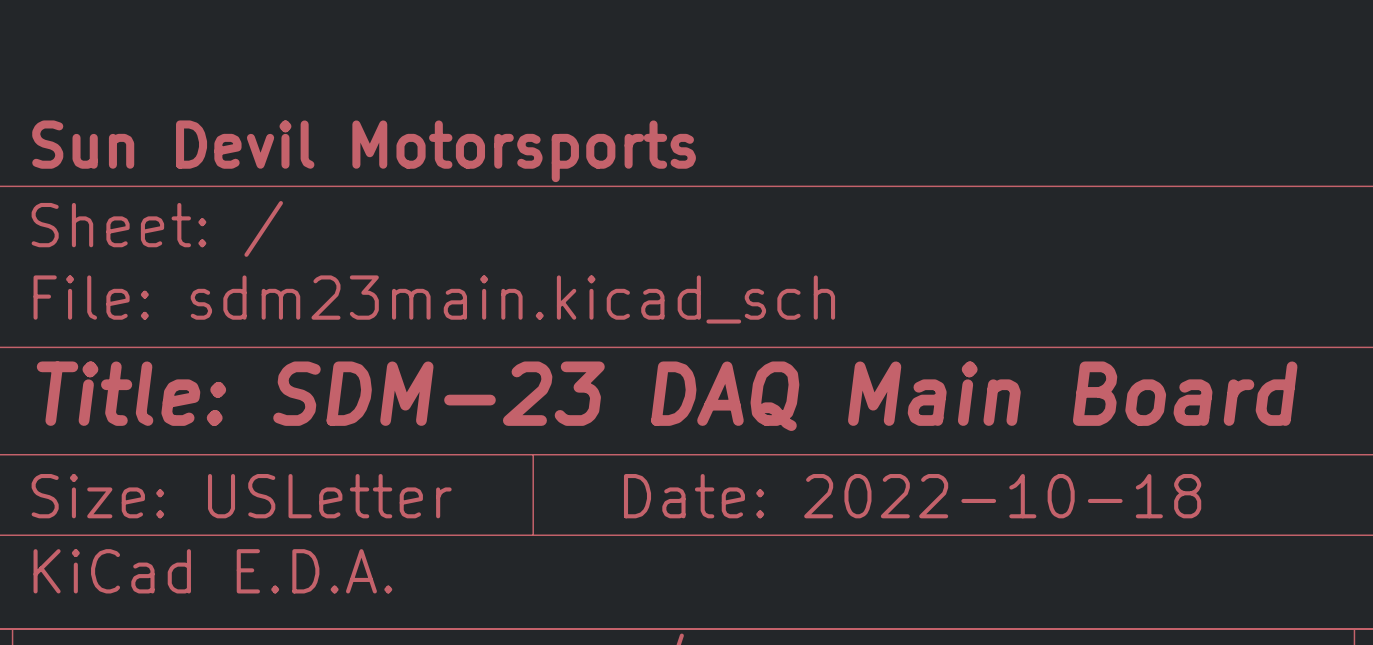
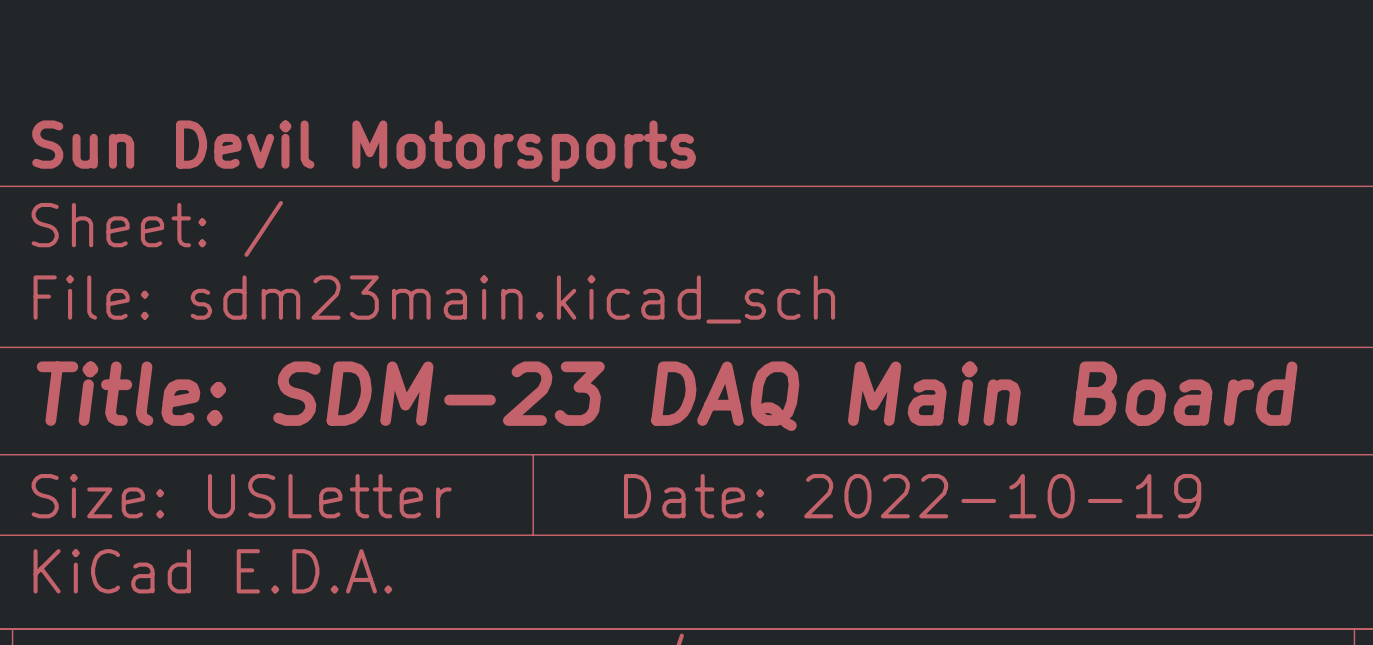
title block: Date: 2022-10-18 (912, 496) -> Date: 2022-10-19 (912, 496)

